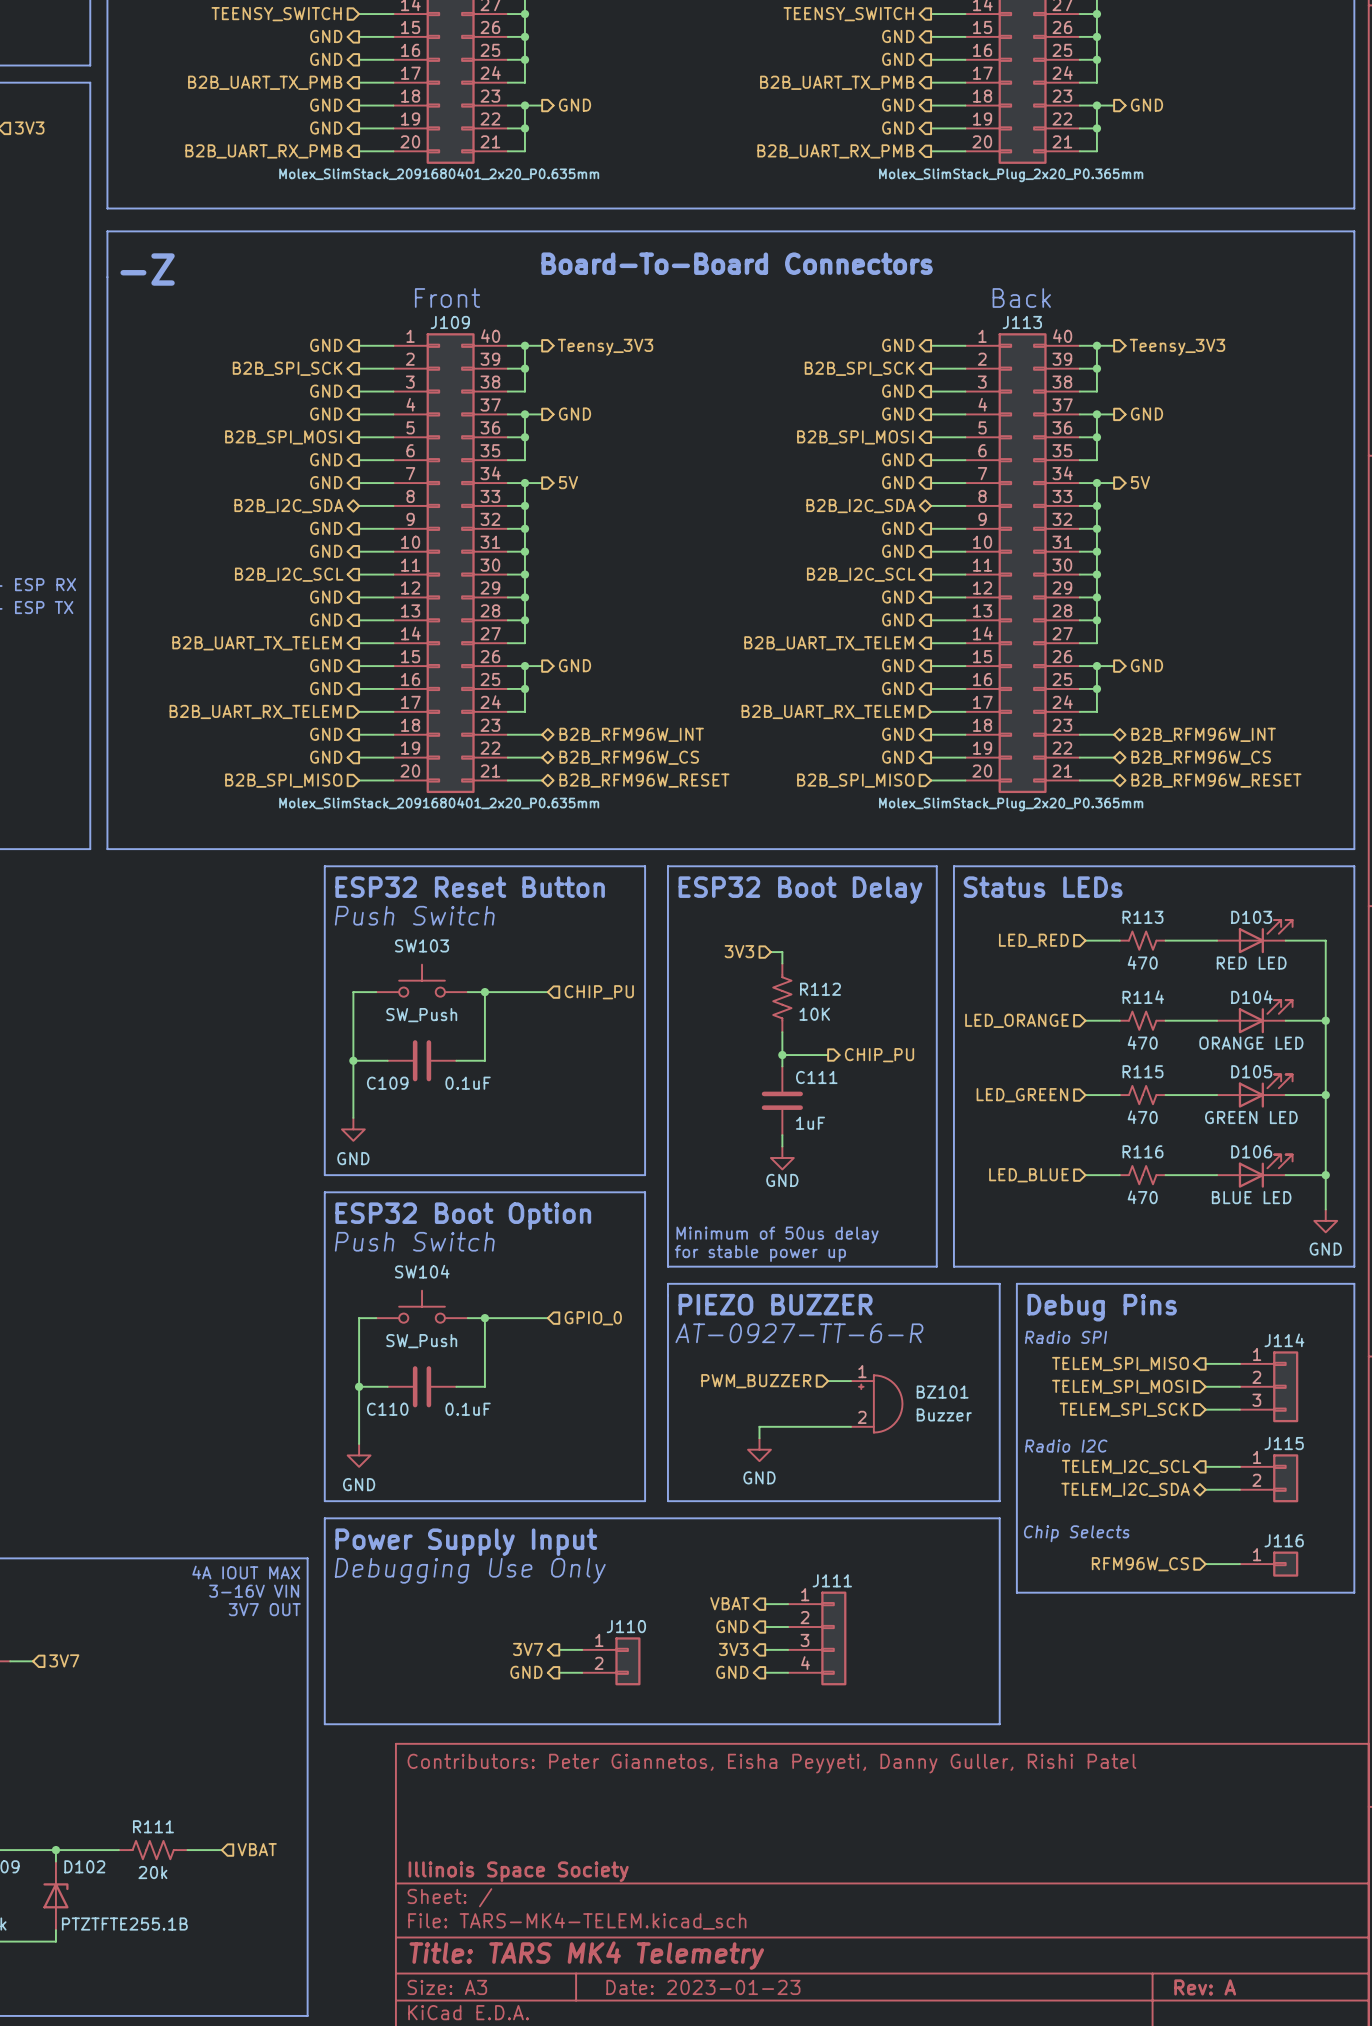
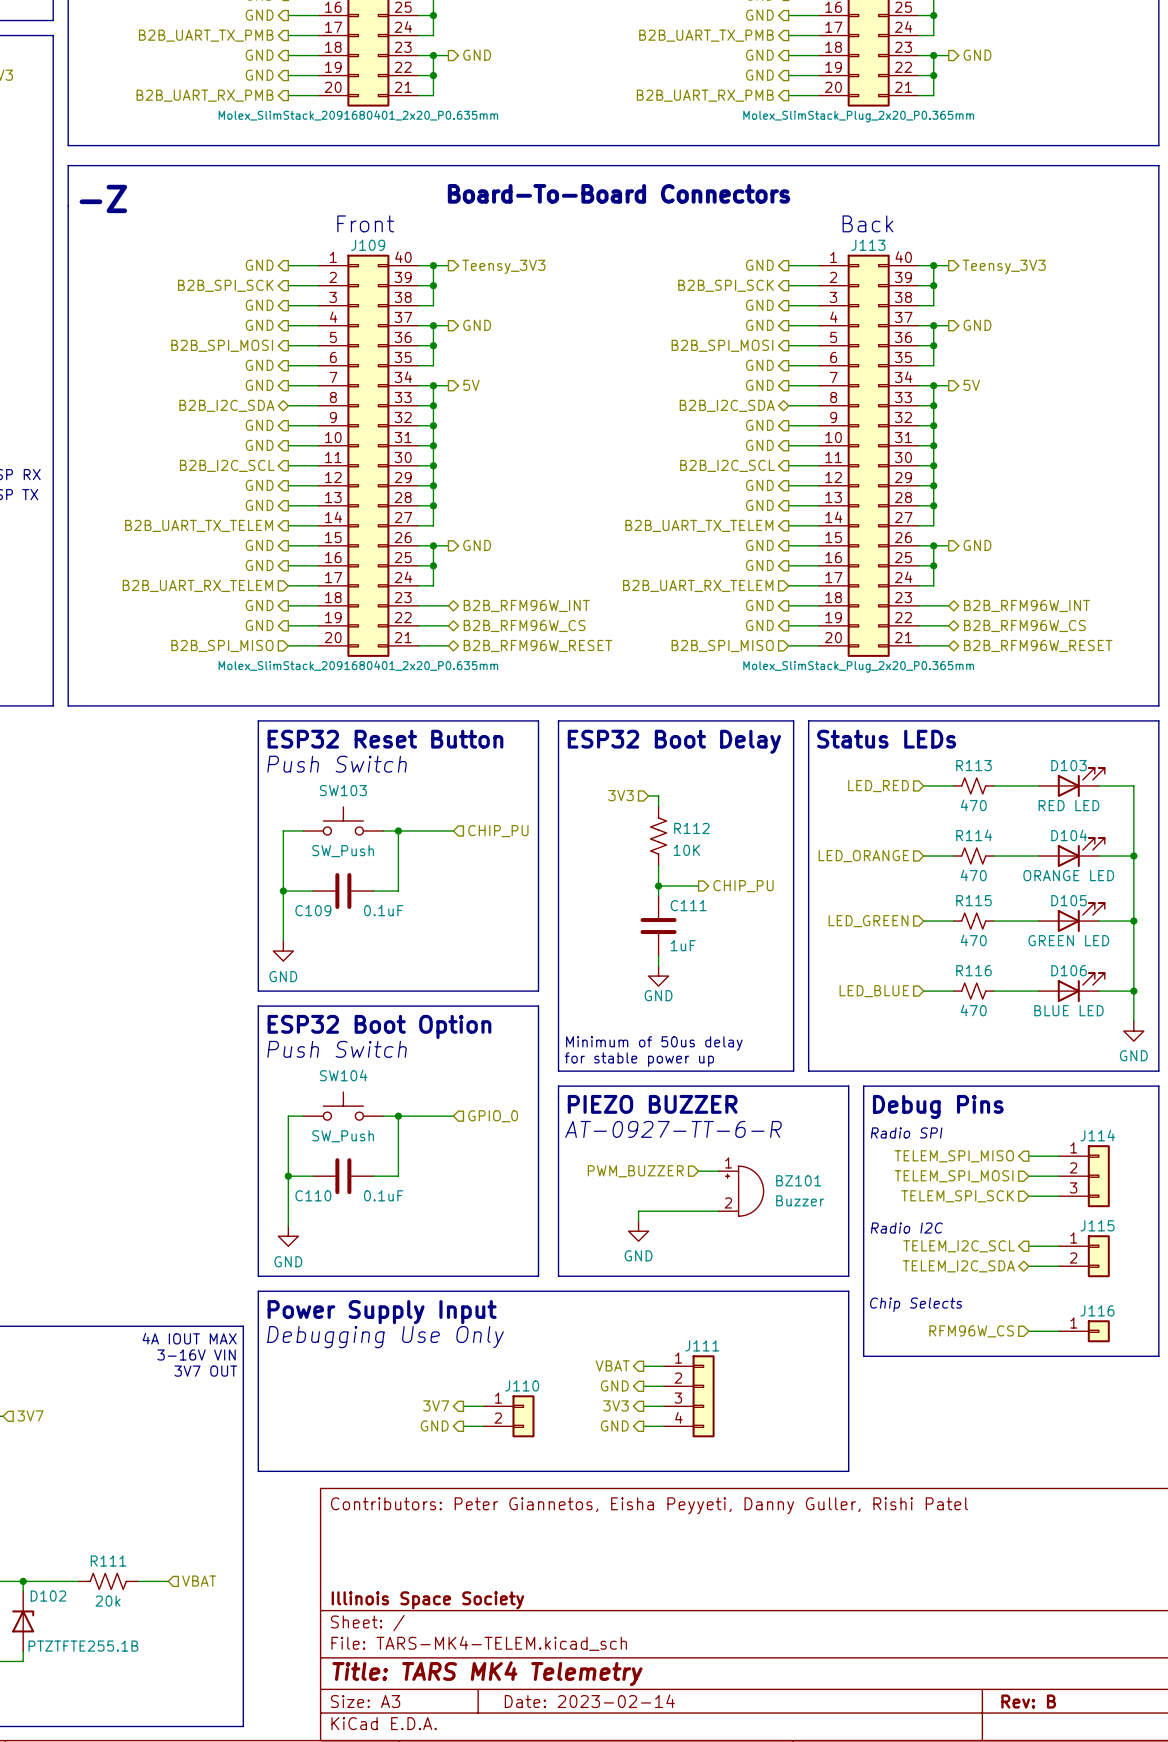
title block: Date: 2023-01-23 (703, 1987) -> Date: 2023-02-14 (589, 1701)
title block: Rev: A (1205, 1987) -> Rev: B (1028, 1701)

